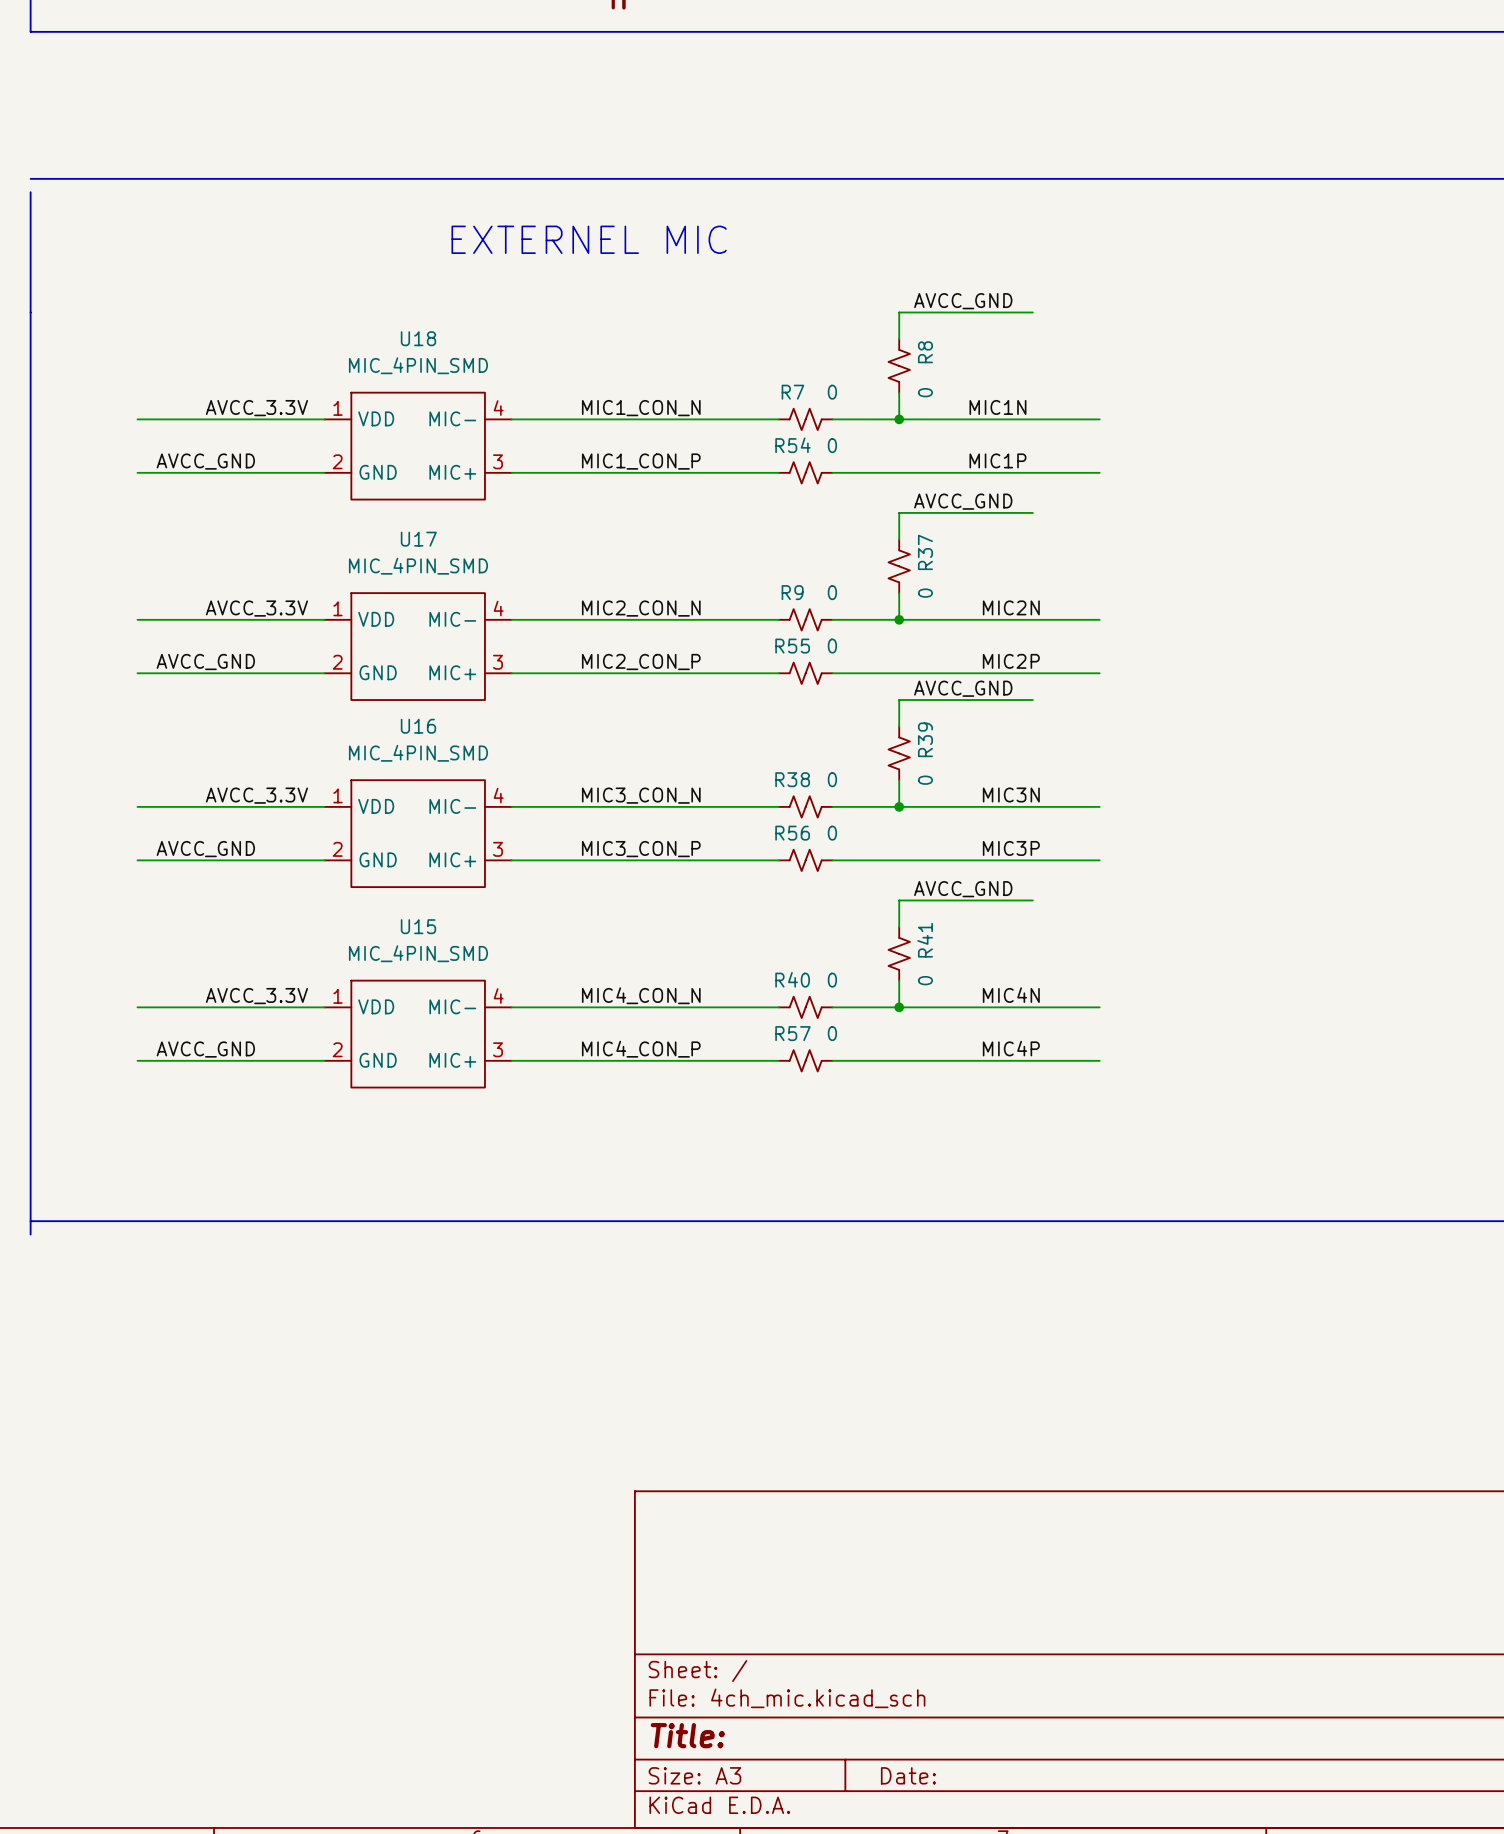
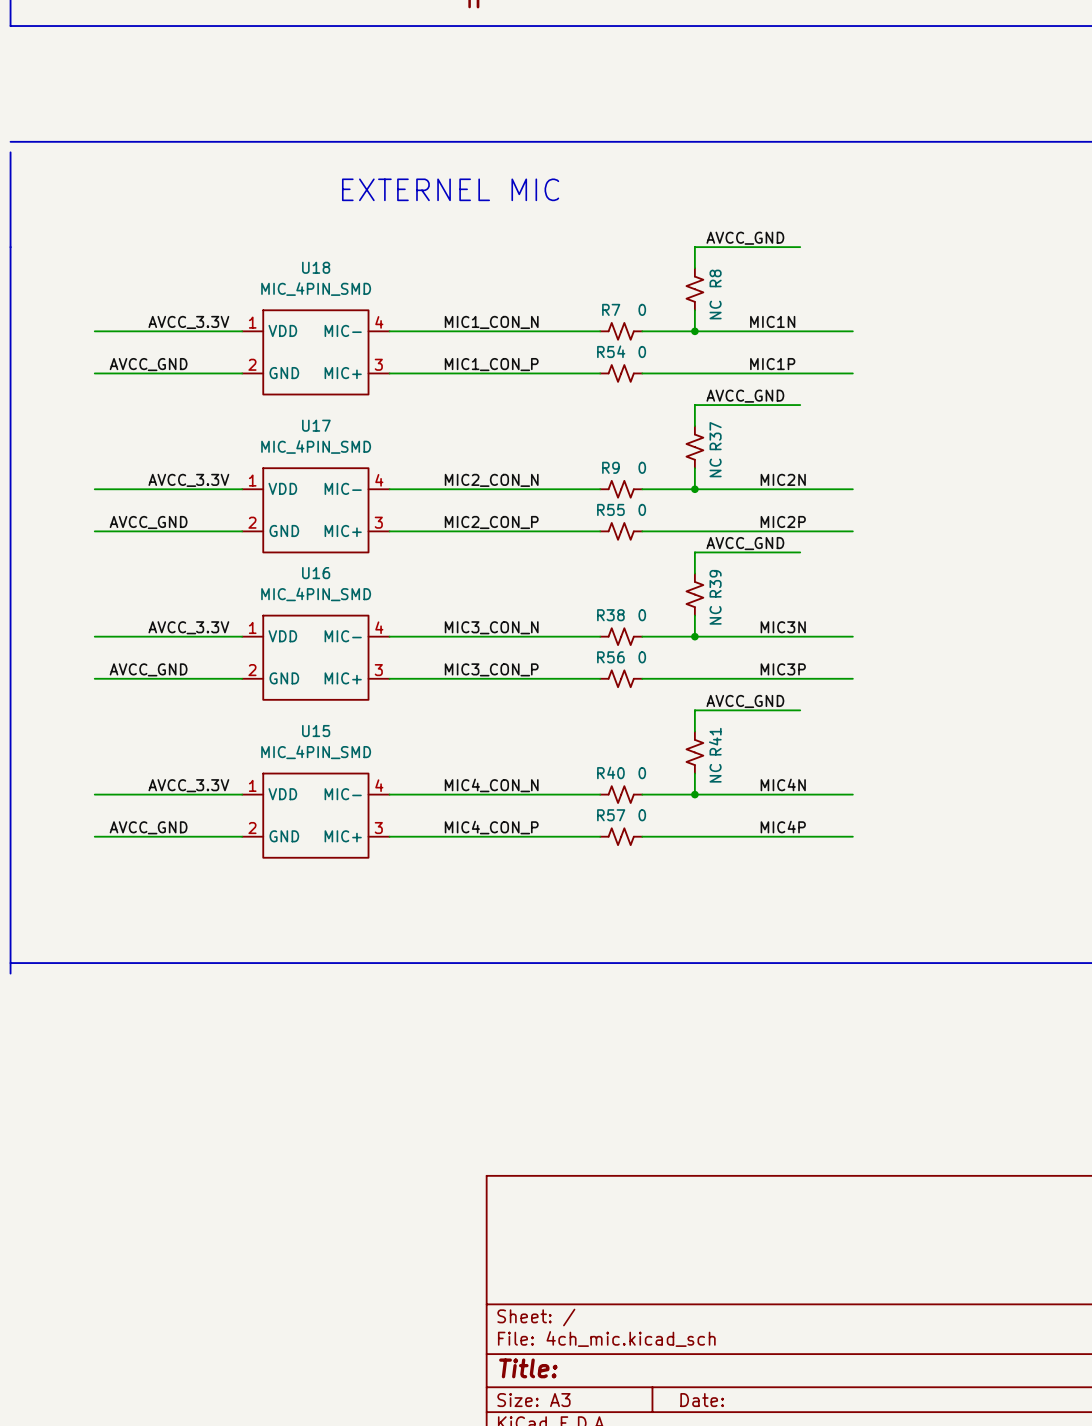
R8 value: 0 (925, 392) -> NC (715, 310)
R37 value: 0 (925, 593) -> NC (715, 467)
R39 value: 0 (925, 780) -> NC (715, 615)
R41 value: 0 (925, 980) -> NC (715, 773)

